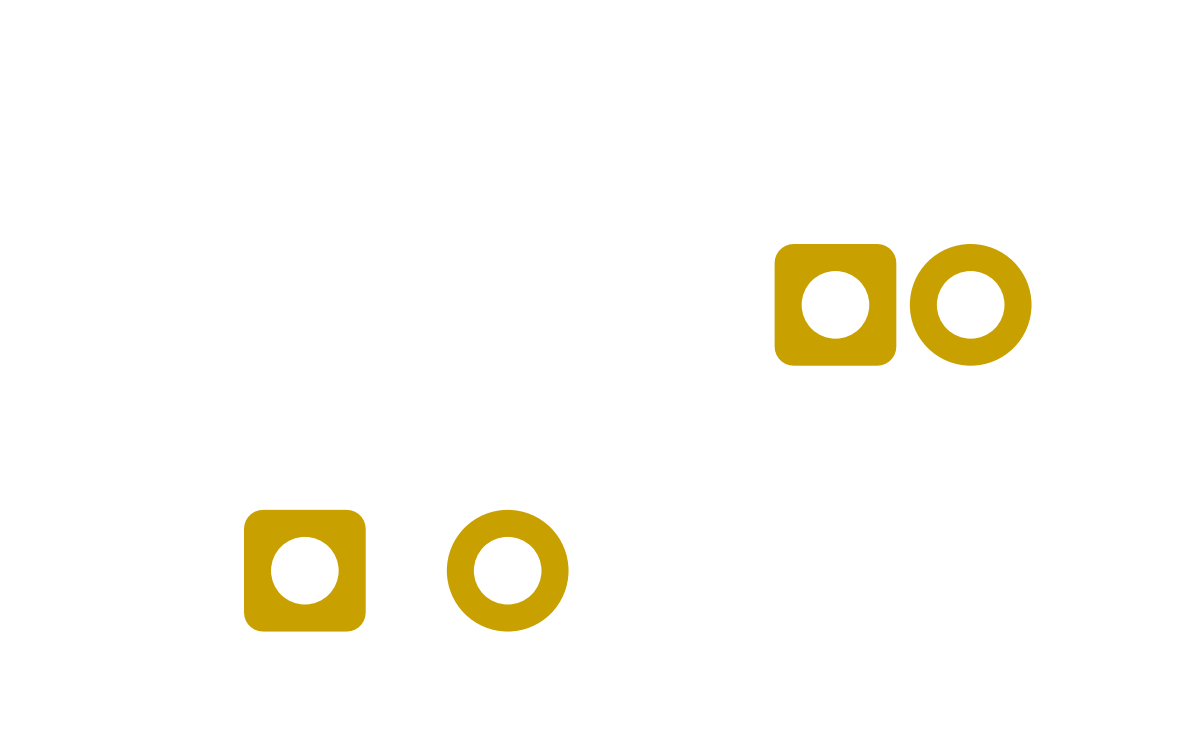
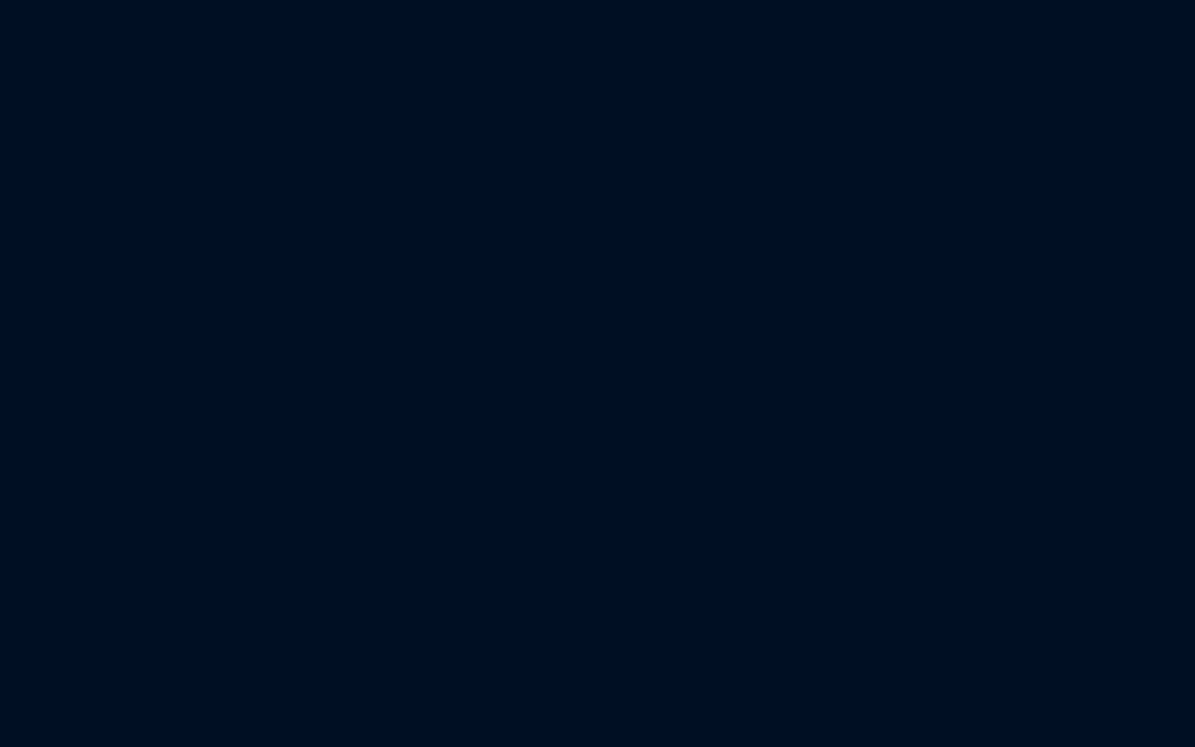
part: (903, 304) -> none
part: (406, 570) -> none

